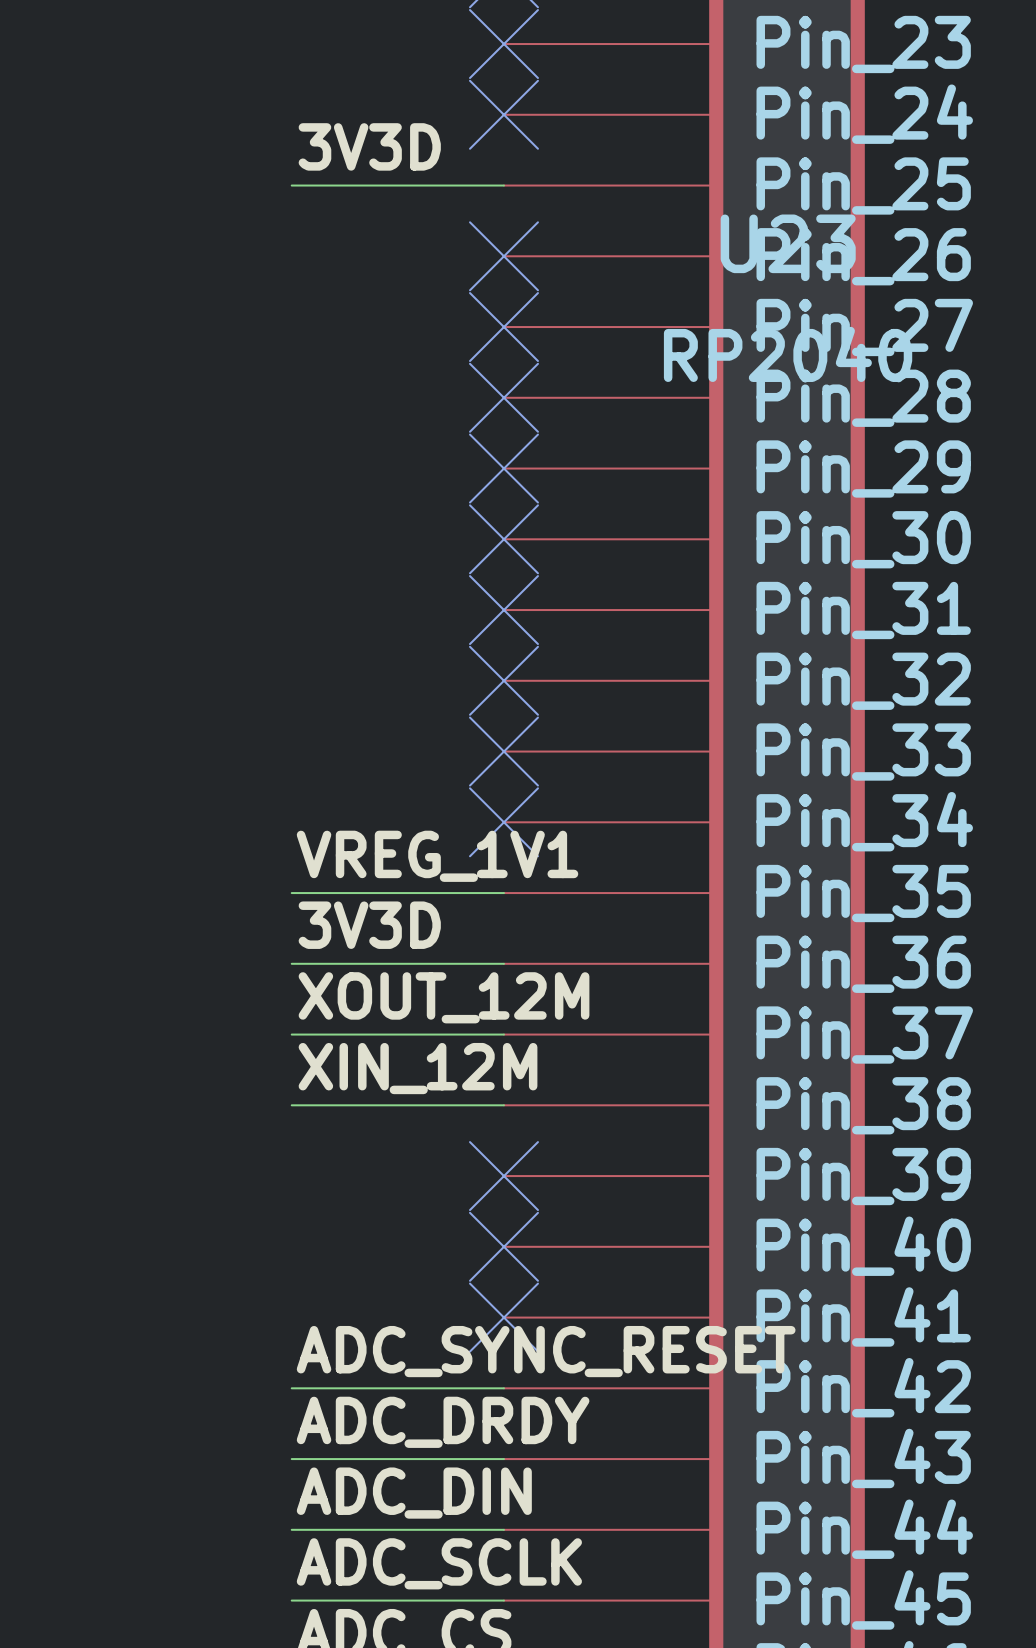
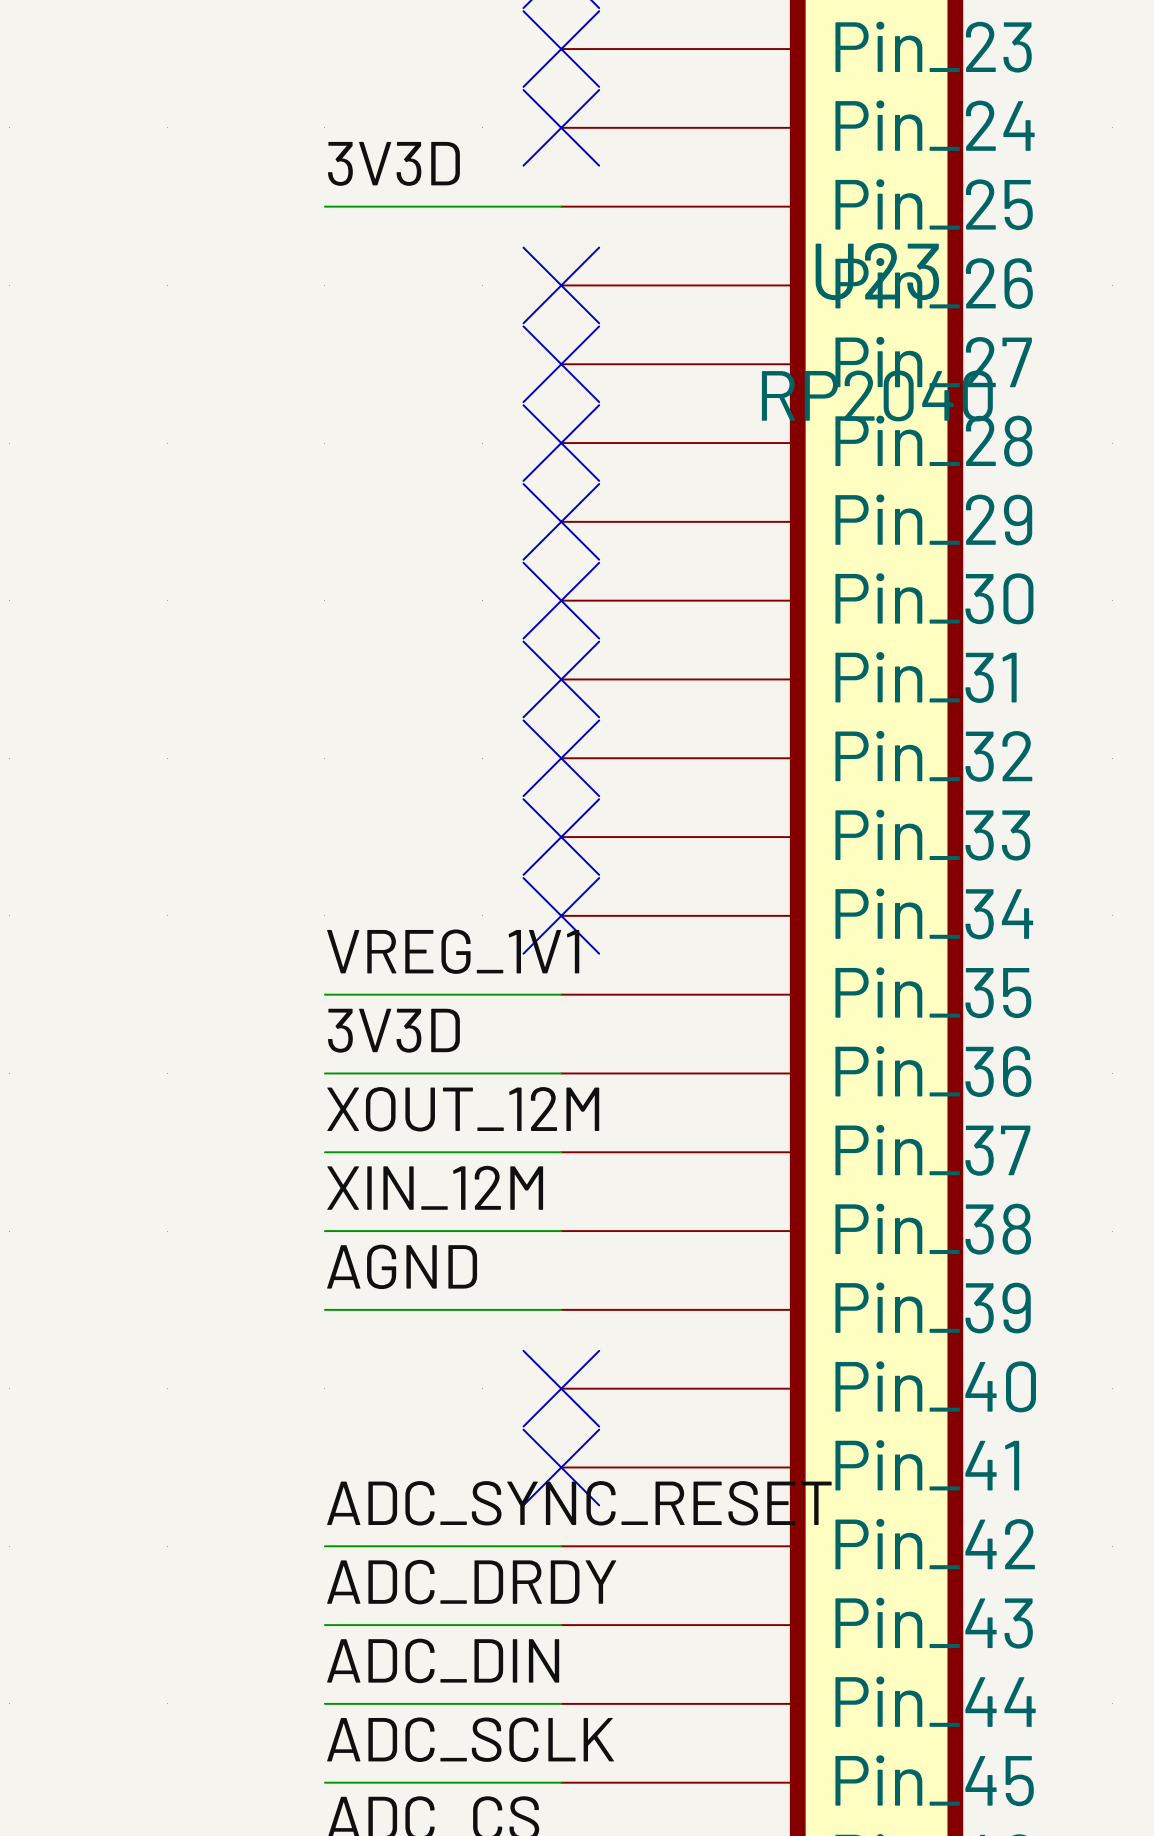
label: none -> AGND (402, 1266)
wire: none -> (324, 1309) (561, 1309)
no-connect mark: (503, 1176) -> none

